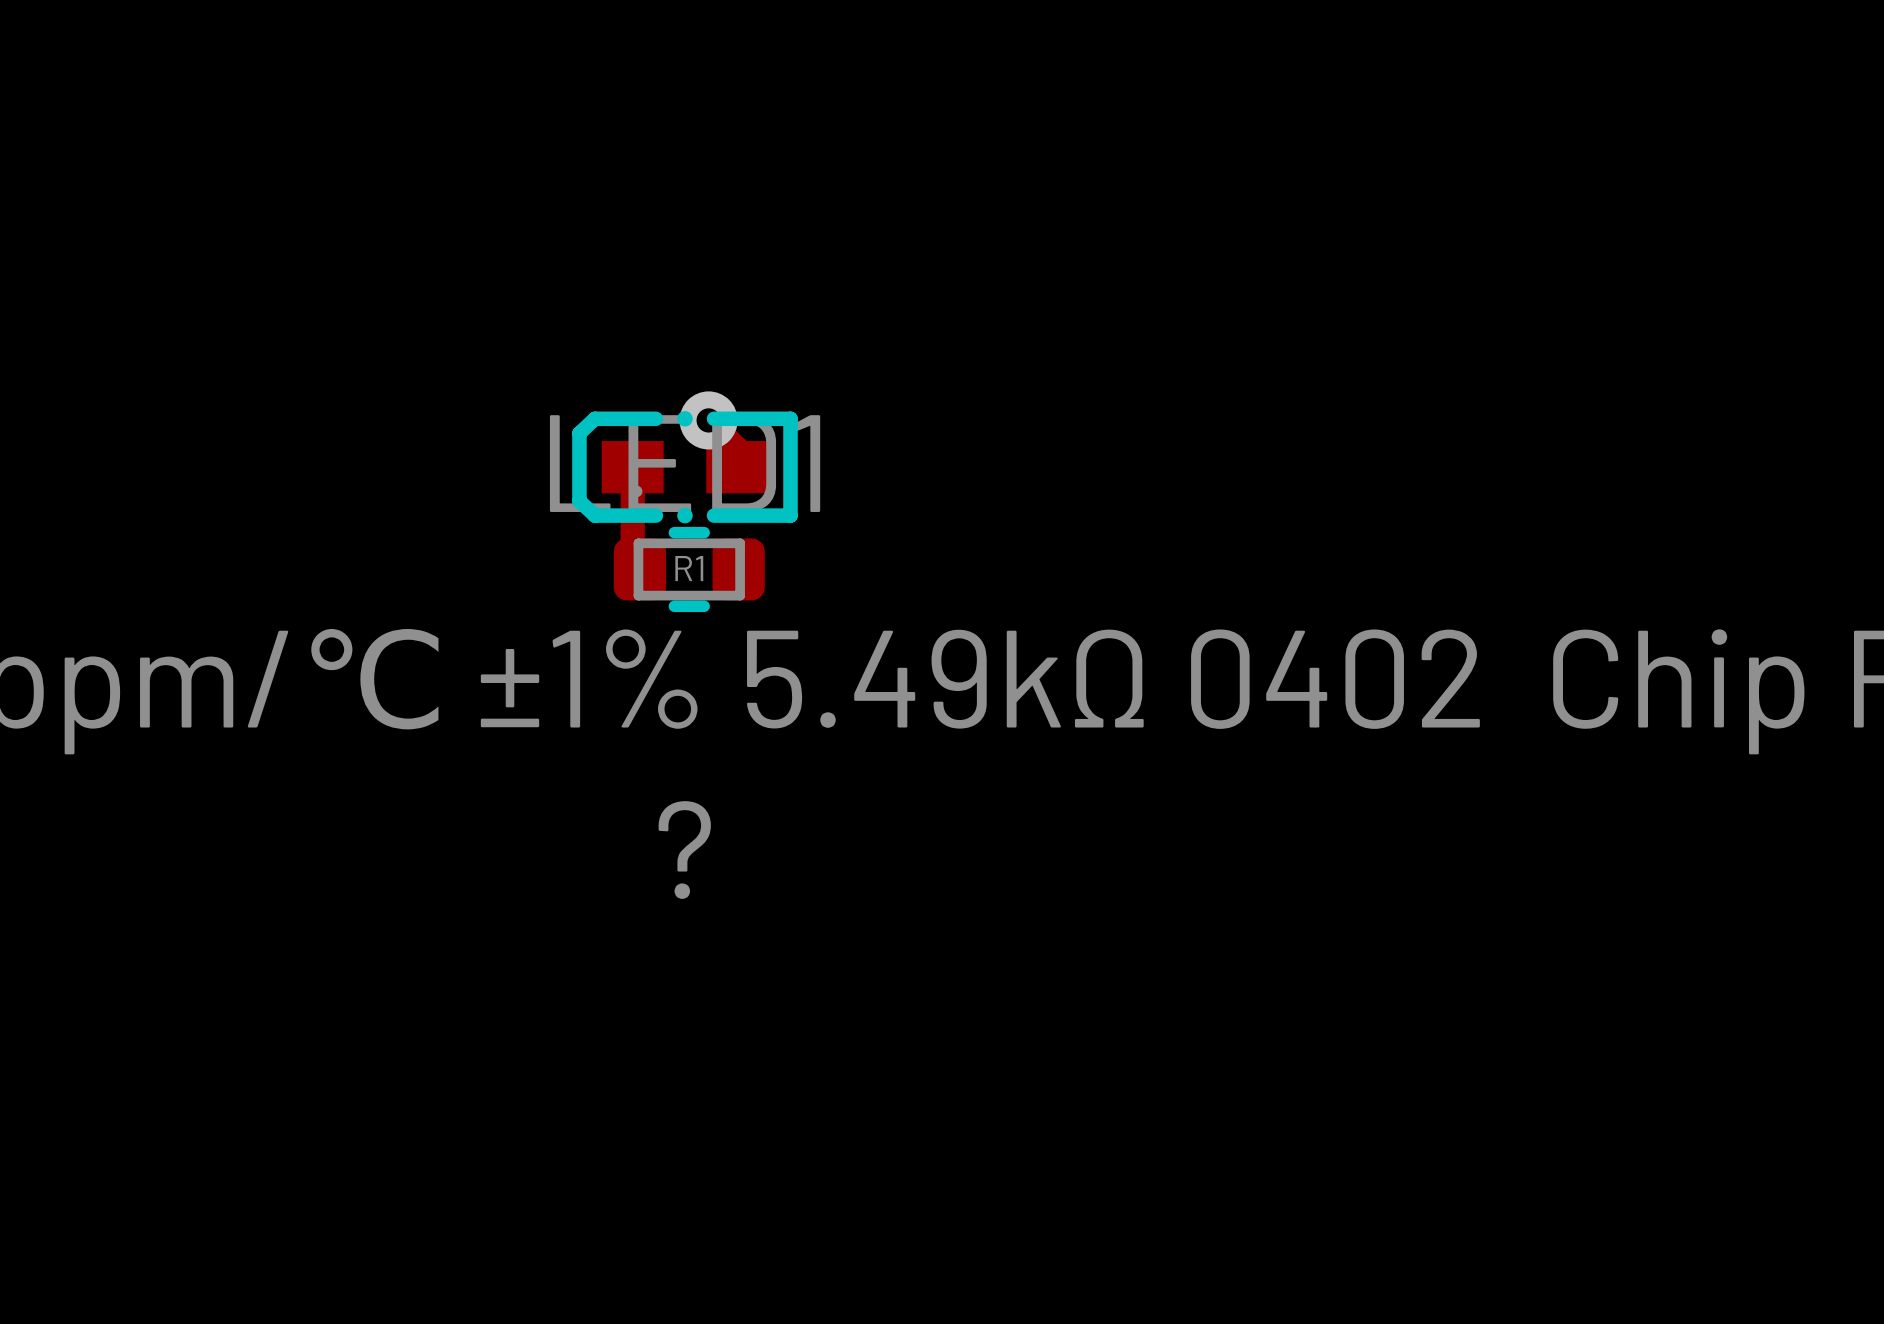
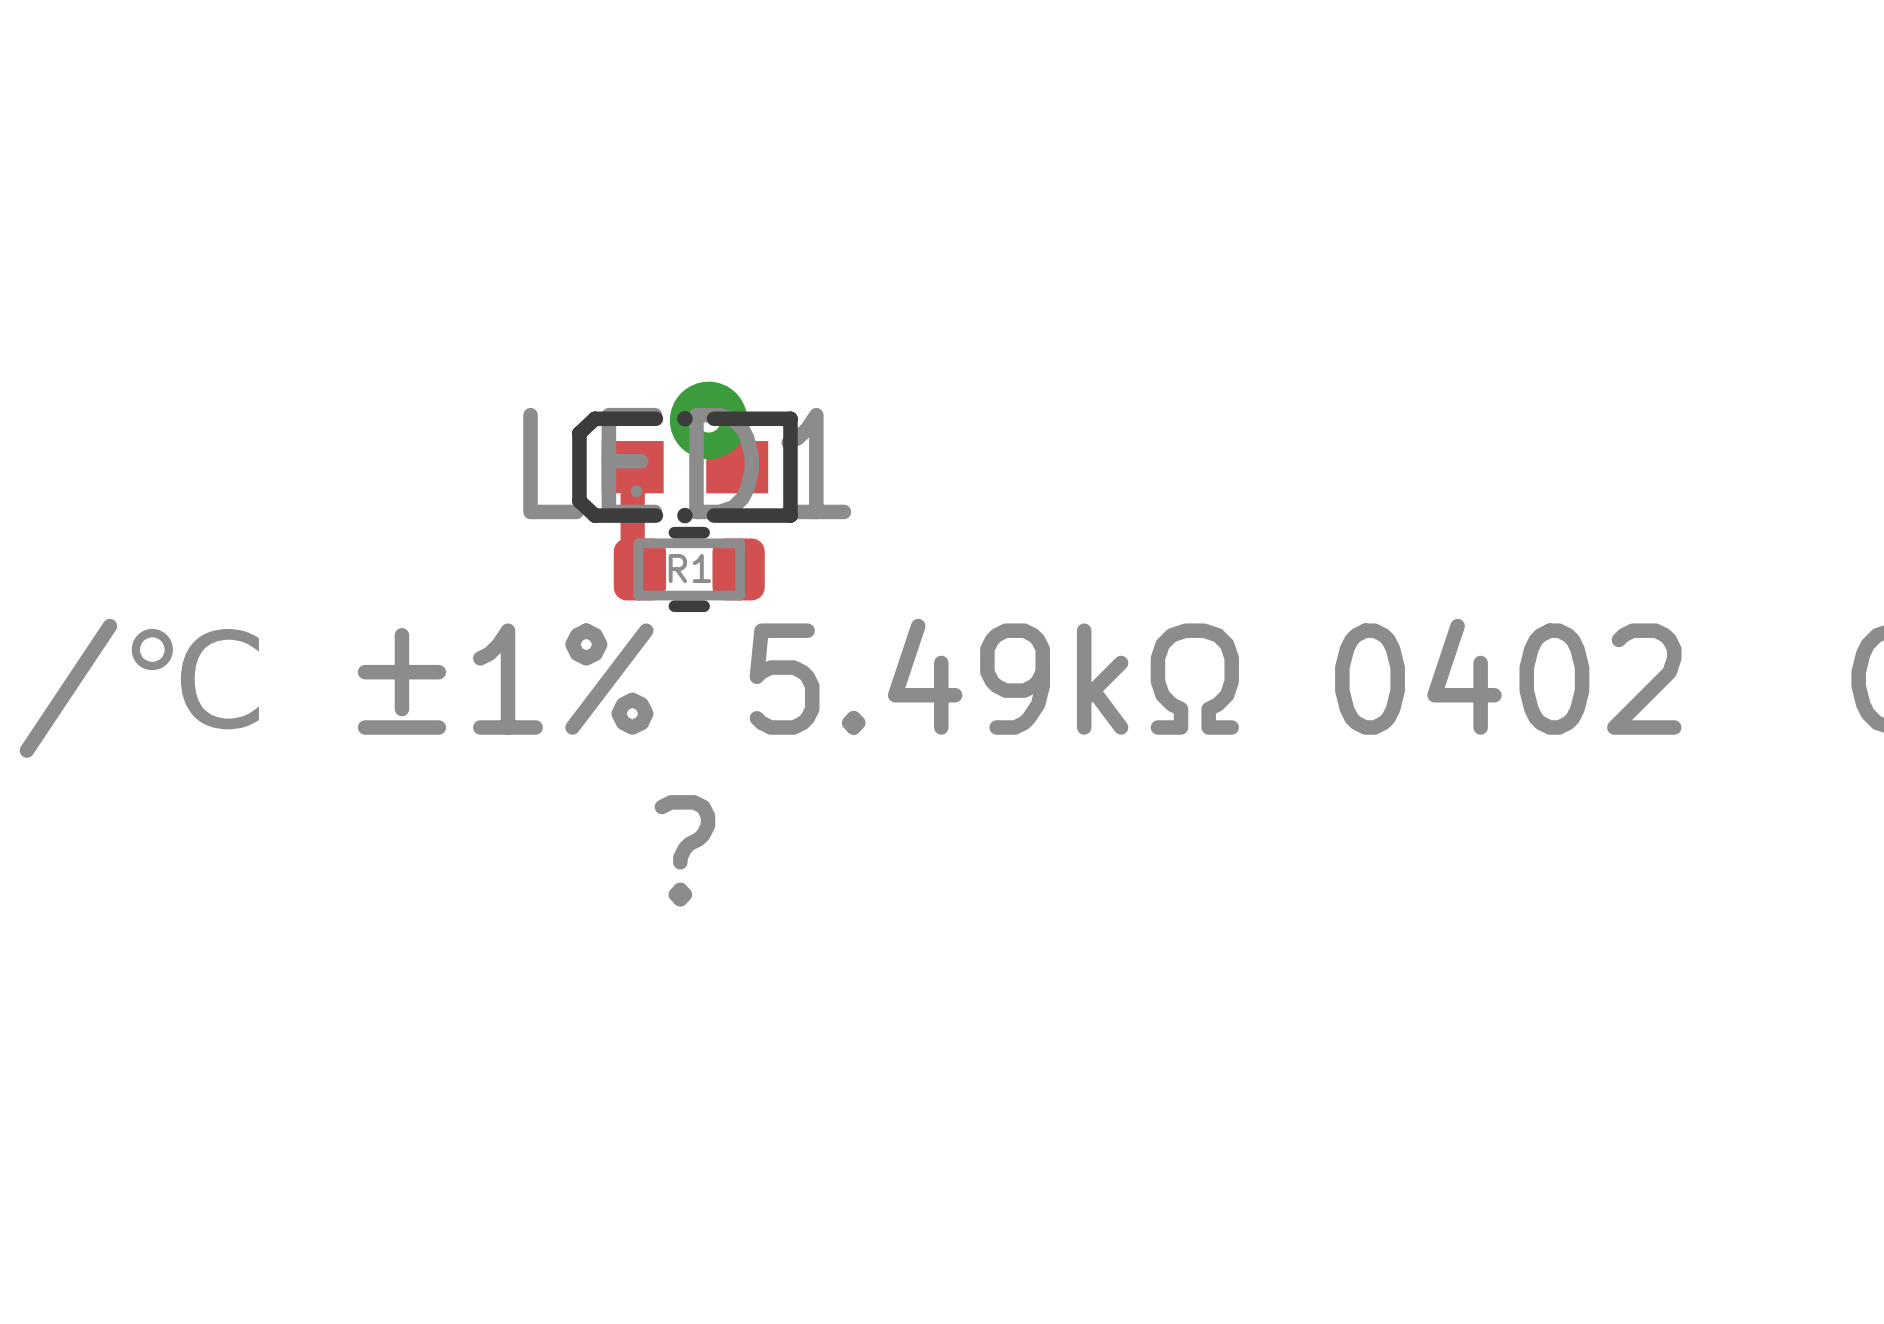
via size: [679, 391, 738, 450] -> [669, 381, 748, 460]

